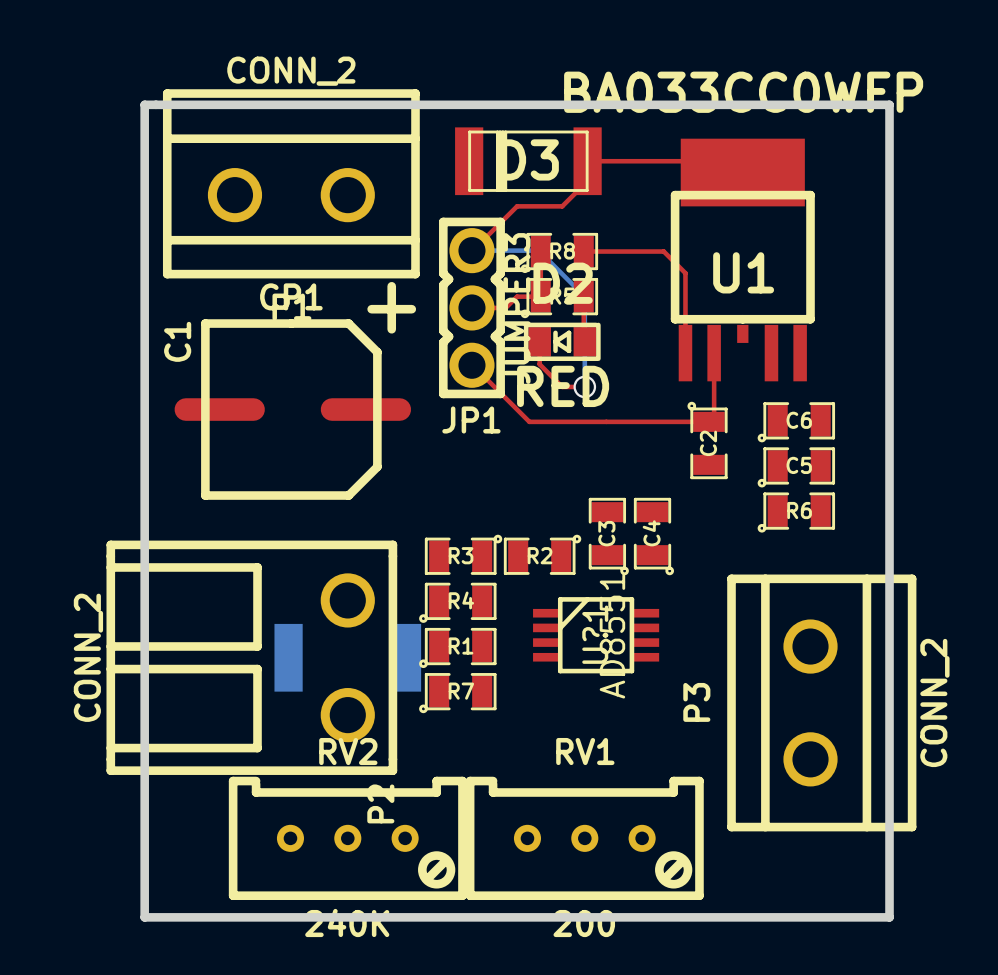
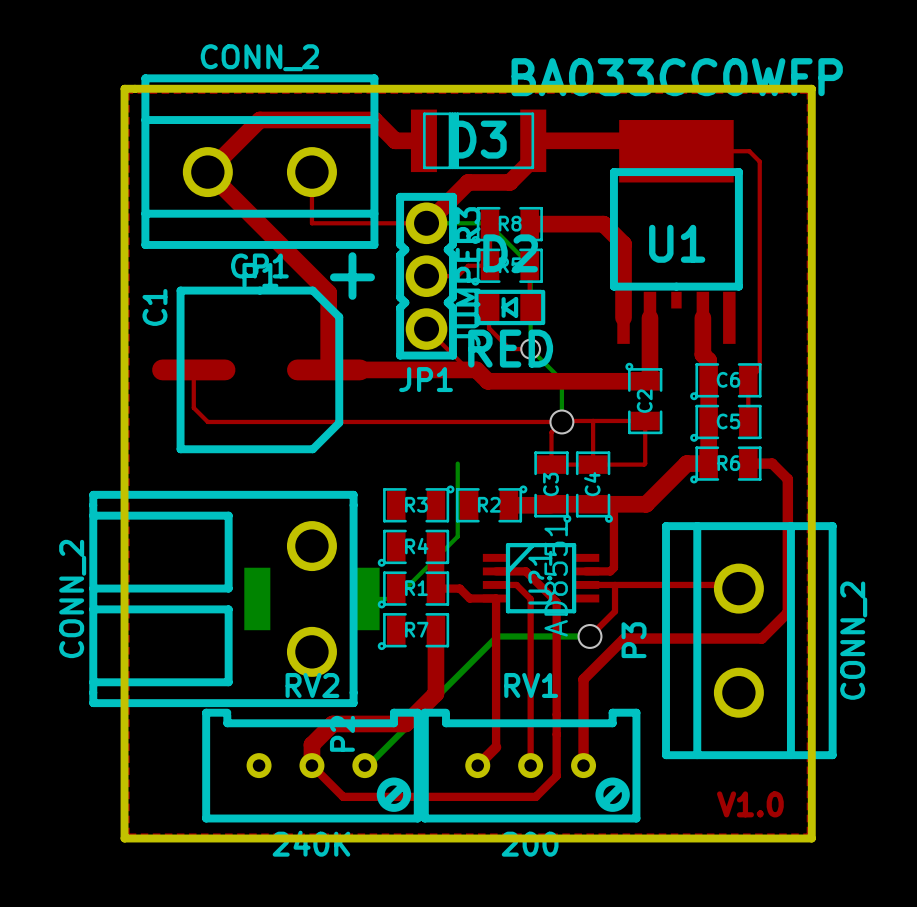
top zone outline: none -> (128, 92) (807, 92) (807, 834) (128, 834) (128, 92)
top track: none -> (423, 140) (395, 140) (374, 119) (259, 119) (207, 172) (328, 292) (328, 369) (476, 369) (487, 381)
top track width: thin (587, 161) (731, 161) -> thick (533, 140) (666, 140)
top track: none -> (676, 151) (749, 151) (759, 161) (759, 368) (748, 380) (748, 421)
top track width: thin (587, 181) (562, 206) (517, 206) (472, 250) -> thick (533, 159) (509, 182) (468, 182) (427, 223)
top track: none -> (311, 172) (311, 223) (426, 223)
top track width: thin (583, 251) (663, 251) (685, 273) (685, 353) -> thick (529, 224) (603, 224) (623, 244) (623, 317)
top track width: thin (714, 353) (714, 416) -> thick (649, 317) (649, 376)
top track: none -> (702, 317) (702, 354) (708, 360) (708, 463) (686, 463) (646, 504) (508, 505)
bottom track: none -> (530, 349) (561, 380) (561, 421)
top track: none -> (193, 369) (193, 407) (207, 421) (561, 421)
top track width: thin (538, 421) (708, 421) -> thick (487, 381) (645, 381)
top track: none -> (562, 420) (645, 420) (645, 463) (551, 464) (551, 432) (562, 420)
top track: none -> (593, 420) (593, 464)
via: none -> (561, 421)
bottom track: none -> (457, 463) (457, 536) (395, 598) (366, 598)
top track: none -> (748, 463) (772, 463) (787, 479) (787, 612) (761, 638) (624, 638) (583, 679) (583, 765)
top track: none -> (613, 504) (613, 567) (610, 571) (586, 571)
top track: none -> (435, 546) (435, 588) (459, 588) (469, 598) (496, 598) (496, 747) (477, 765)
top track: none -> (496, 571) (525, 571) (556, 602) (556, 776) (535, 796) (343, 796) (311, 765) (311, 744) (332, 723) (405, 723) (435, 693) (435, 630)
top track: none -> (496, 584) (516, 584) (530, 599) (530, 765)
top track: none -> (586, 584) (735, 584) (738, 588)
top track: none -> (615, 584) (615, 611) (589, 636)
bottom track: none -> (589, 636) (497, 636) (368, 765) (364, 765)
via: none -> (589, 636)
text: none -> V1.0 (750, 804)

